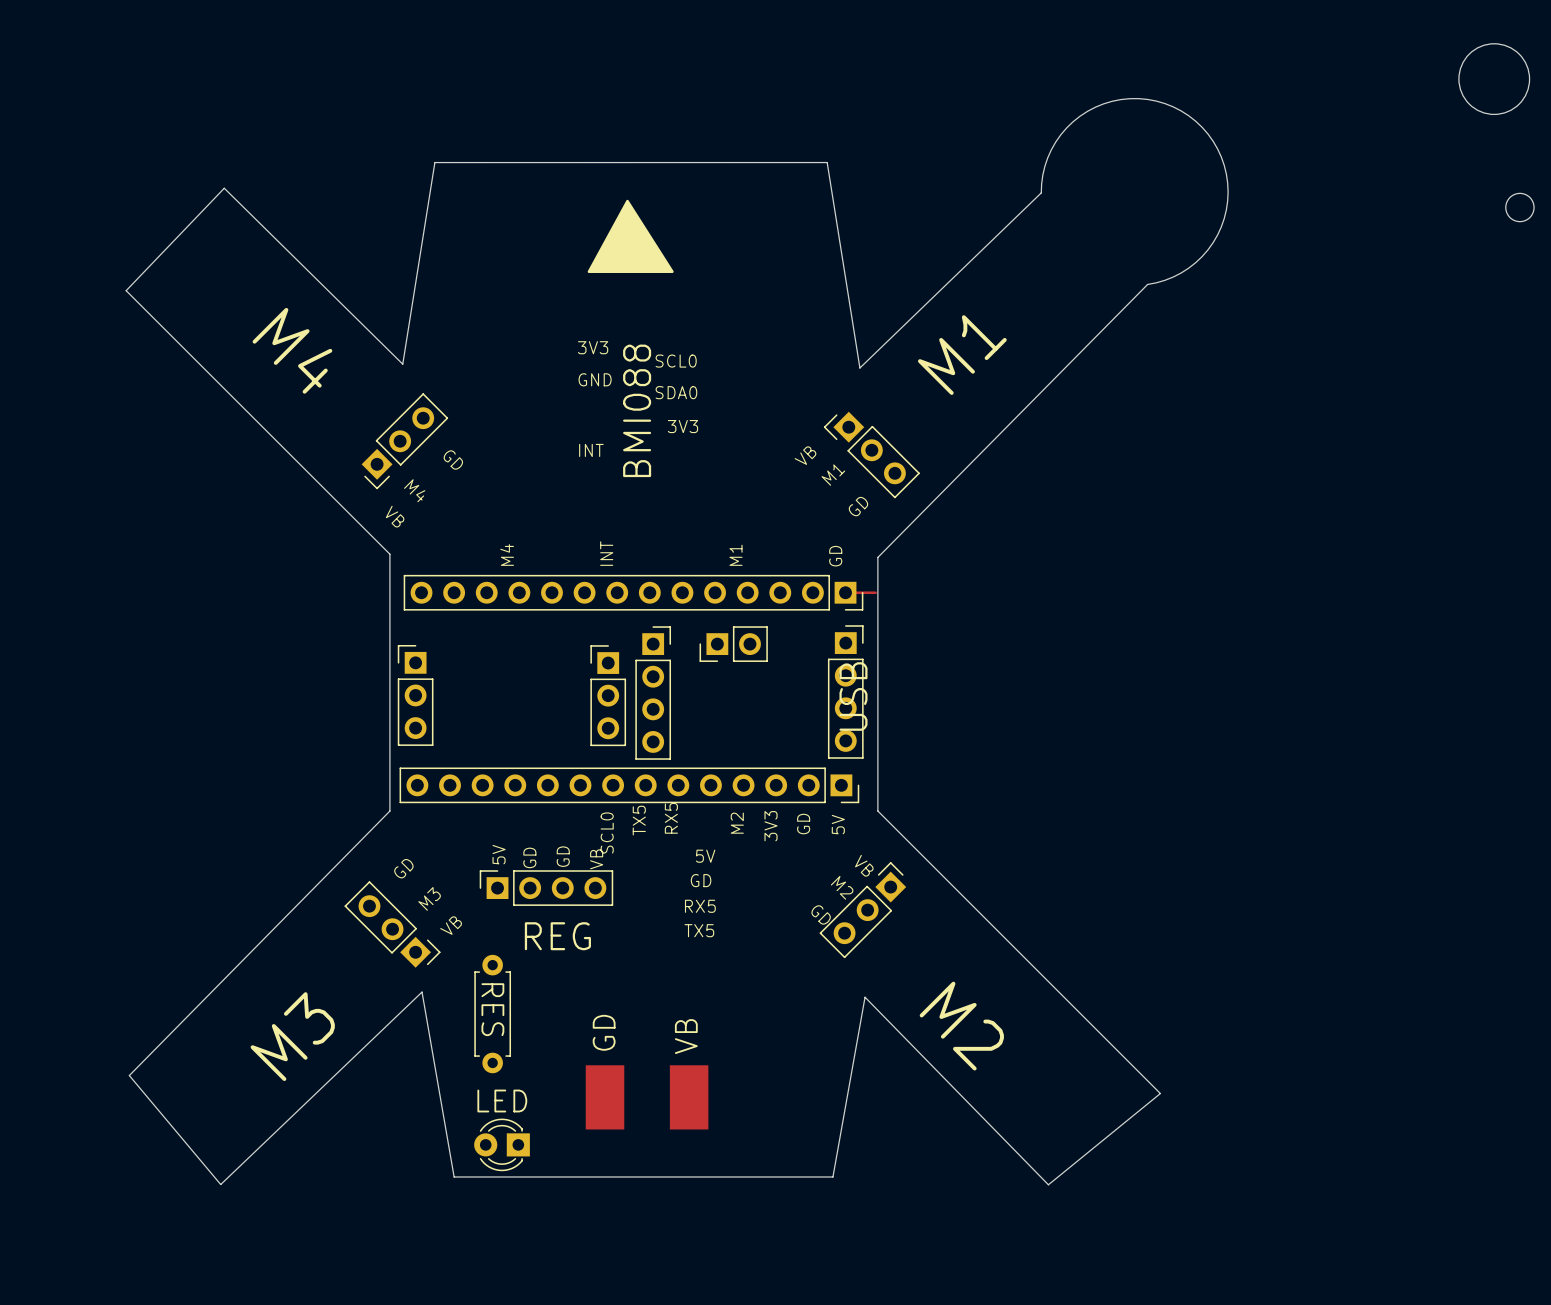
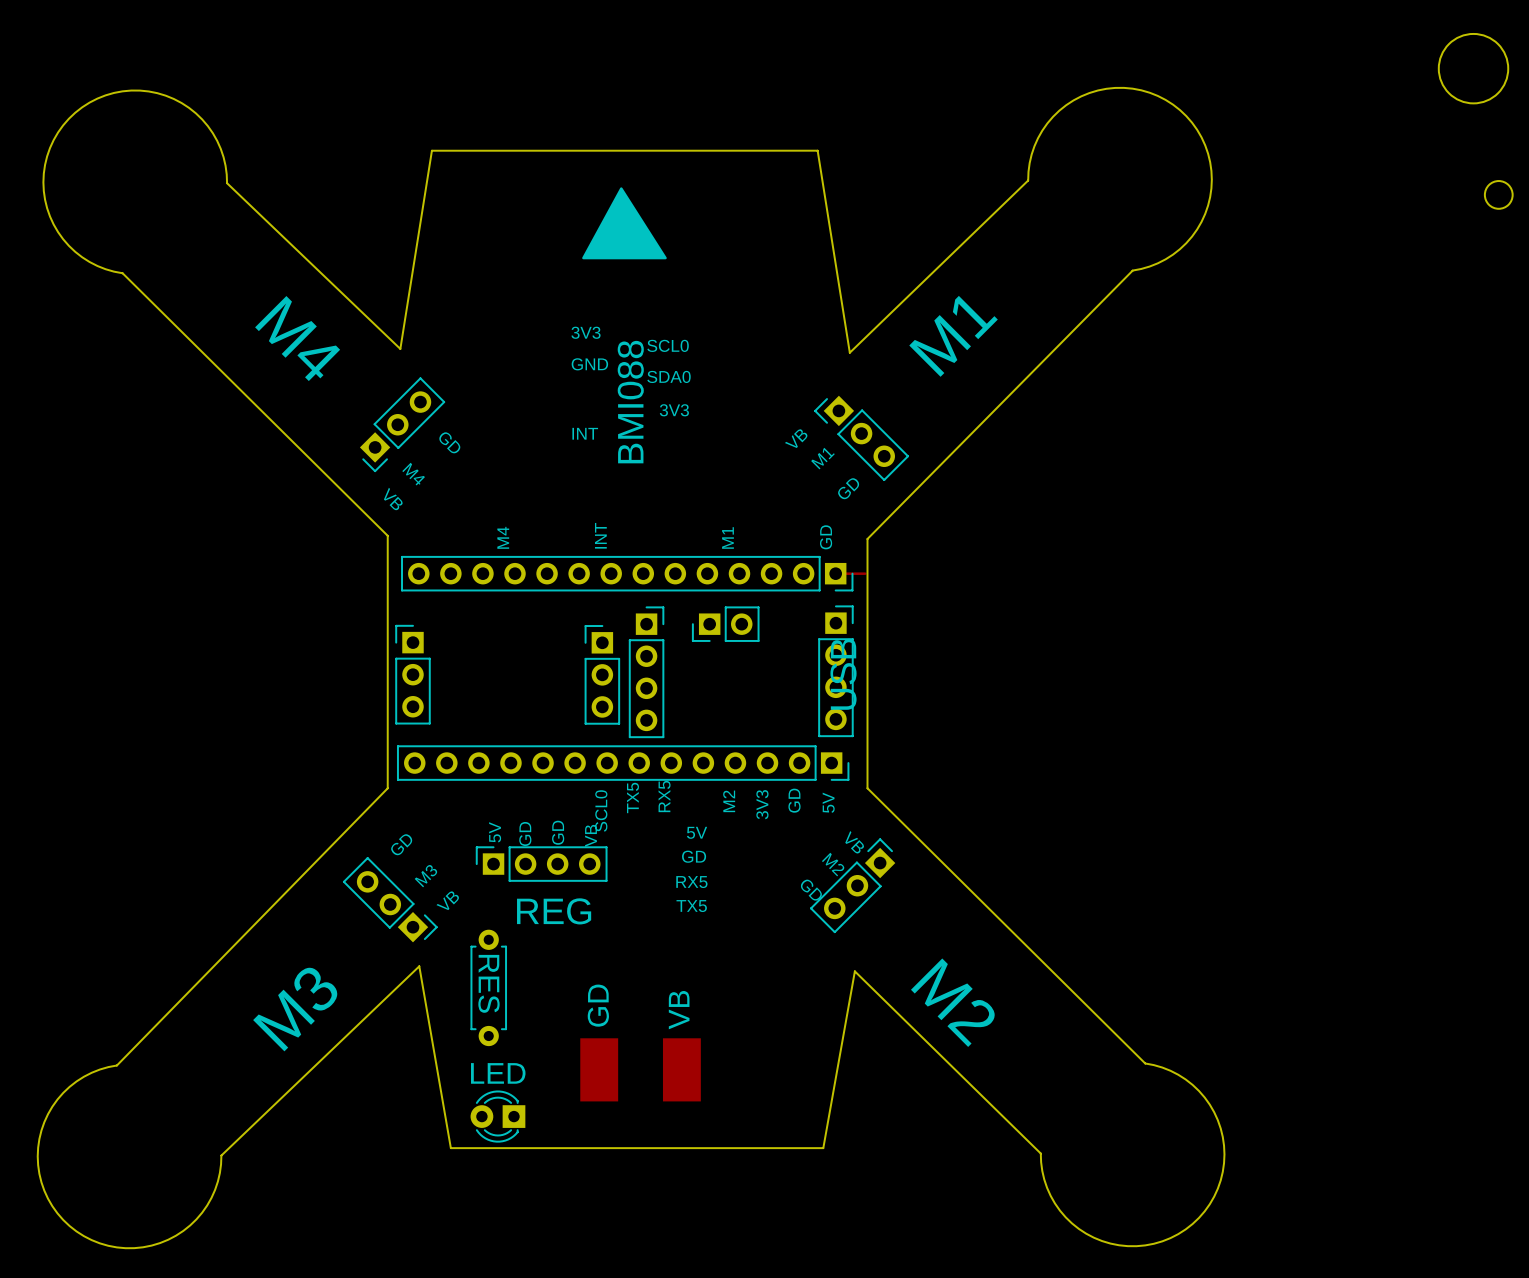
board edge: (402, 364) (224, 188) (126, 290) (389, 554) -> (400, 348) (227, 183) (225, 165) (217, 140) (202, 119) (181, 103) (165, 95) (148, 91) (131, 90) (113, 92) (97, 98) (82, 107) (68, 118) (58, 132) (47, 156) (43, 182) (45, 199) (50, 216) (63, 239) (75, 251) (89, 262) (105, 269) (122, 273) (387, 535)
board edge: (389, 811) (129, 1075) (220, 1184) -> (387, 788) (116, 1065) (91, 1072) (76, 1081) (63, 1092) (52, 1106) (44, 1122) (39, 1138) (37, 1156) (39, 1173) (44, 1190) (52, 1206) (63, 1219) (76, 1231) (91, 1240) (108, 1245) (125, 1248) (143, 1247) (160, 1243) (176, 1235) (196, 1219) (207, 1205) (215, 1189) (219, 1172) (221, 1155)
board edge: (877, 811) (1160, 1093) (1048, 1184) (865, 997) -> (867, 788) (1145, 1063) (1162, 1067) (1178, 1074) (1192, 1084) (1204, 1097) (1214, 1112) (1220, 1128) (1224, 1154) (1220, 1180) (1209, 1204) (1198, 1217) (1185, 1229) (1170, 1238) (1153, 1243) (1136, 1246) (1119, 1245) (1093, 1237) (1078, 1228) (1060, 1210) (1050, 1195) (1044, 1179) (1040, 1153) (854, 971)

